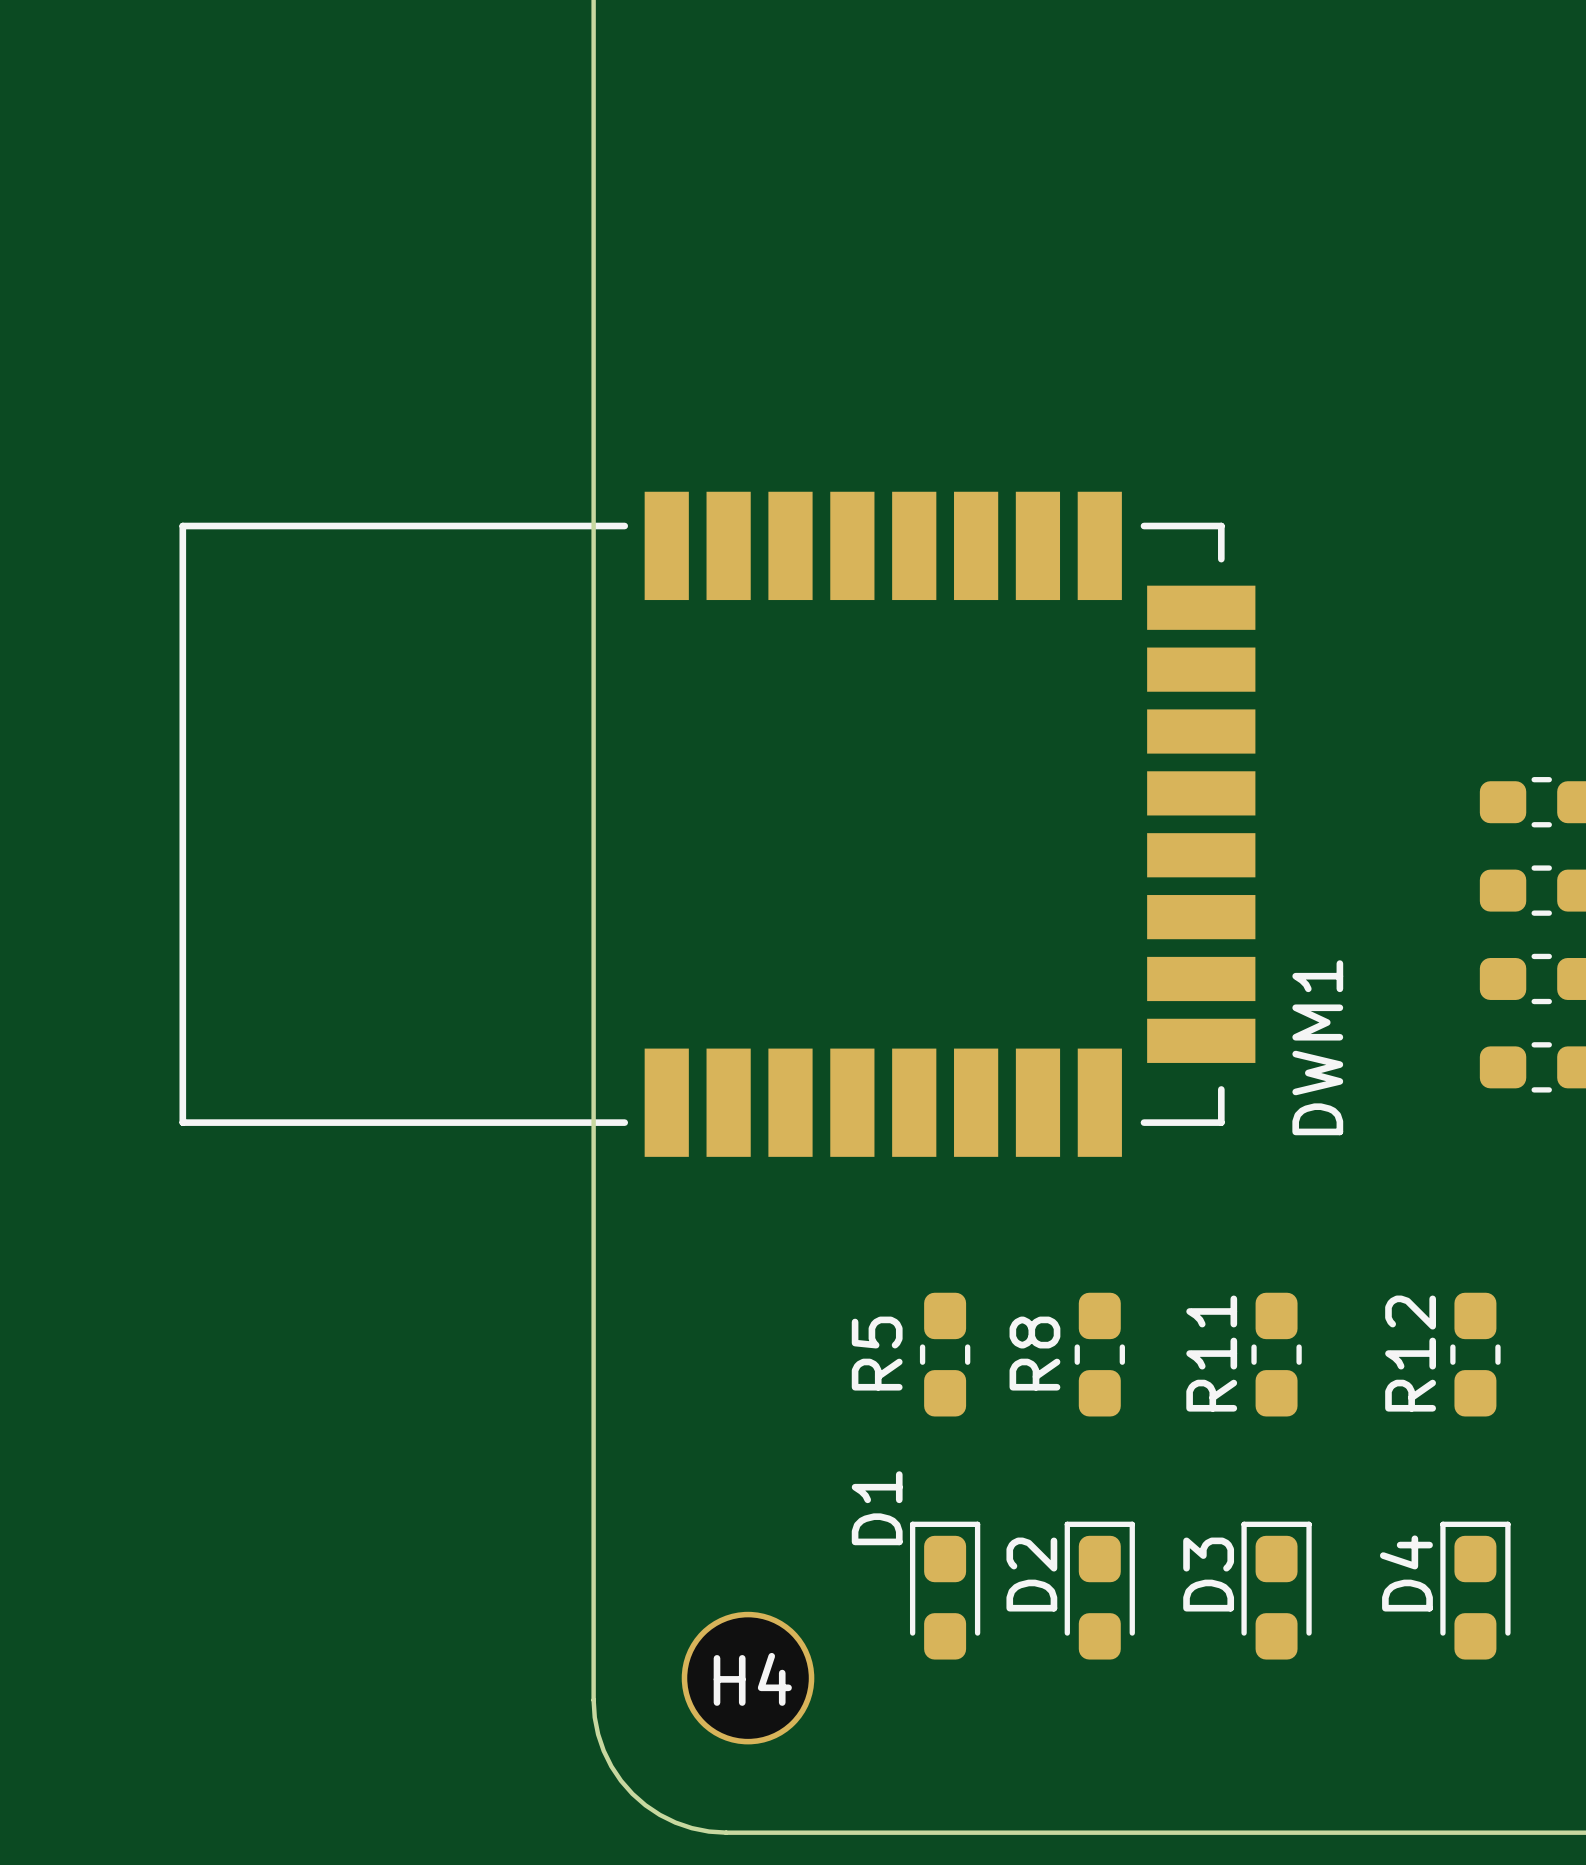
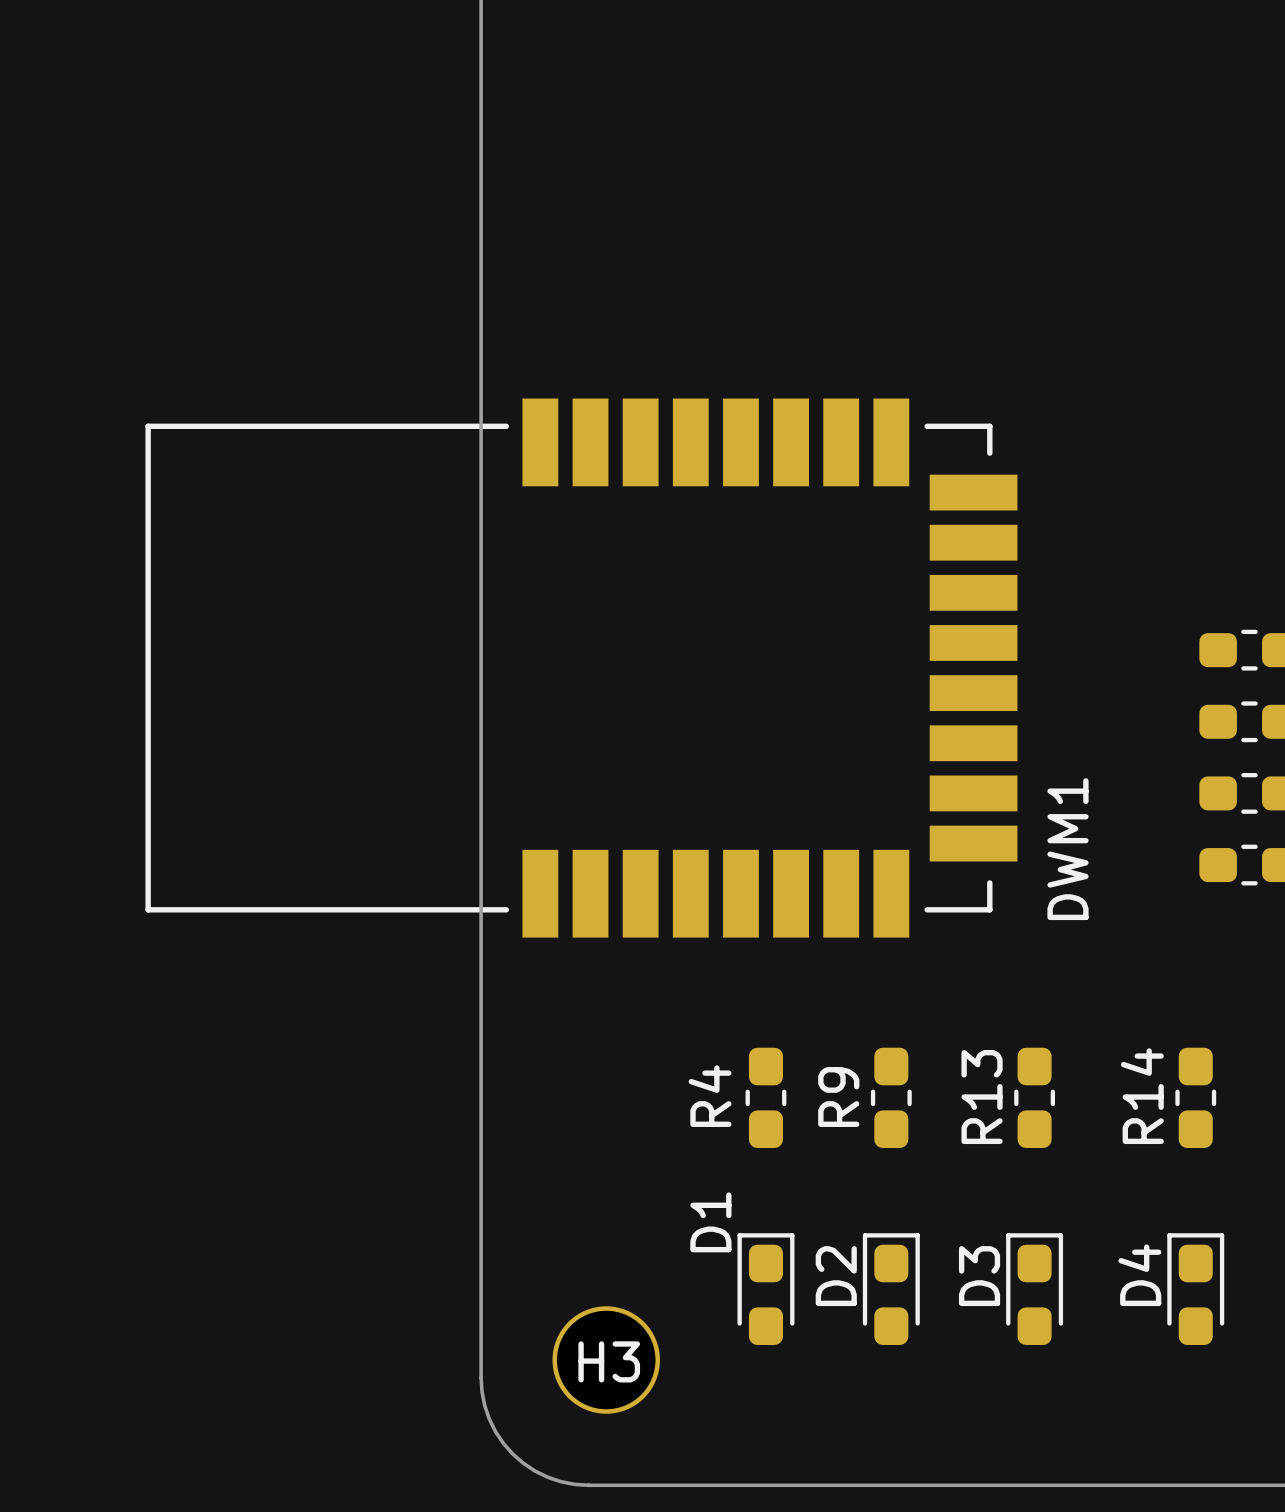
R5 name: R5 (877, 1353) -> R4 (710, 1096)
R8 name: R8 (1034, 1353) -> R9 (838, 1097)
R11 name: R11 (1211, 1353) -> R13 (982, 1097)
R12 name: R12 (1410, 1353) -> R14 (1142, 1096)
H4 name: H4 (752, 1679) -> H3 (609, 1361)

